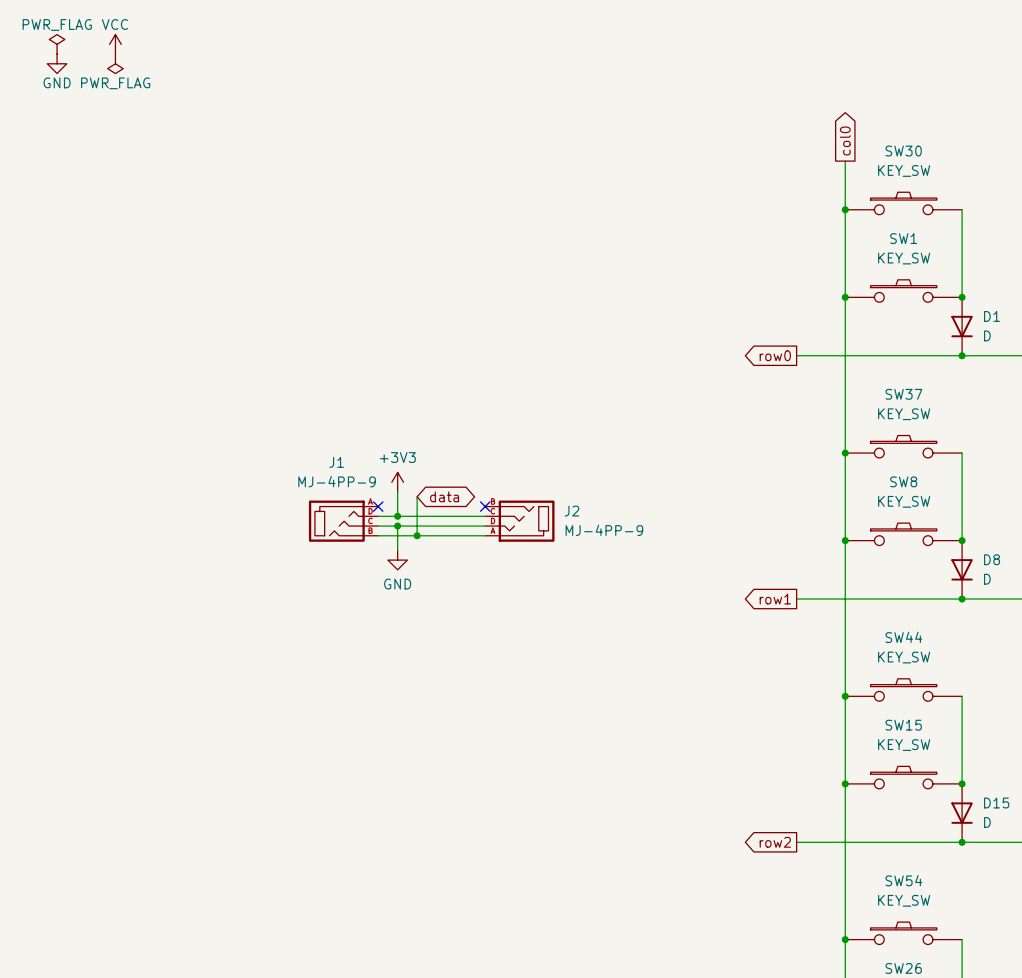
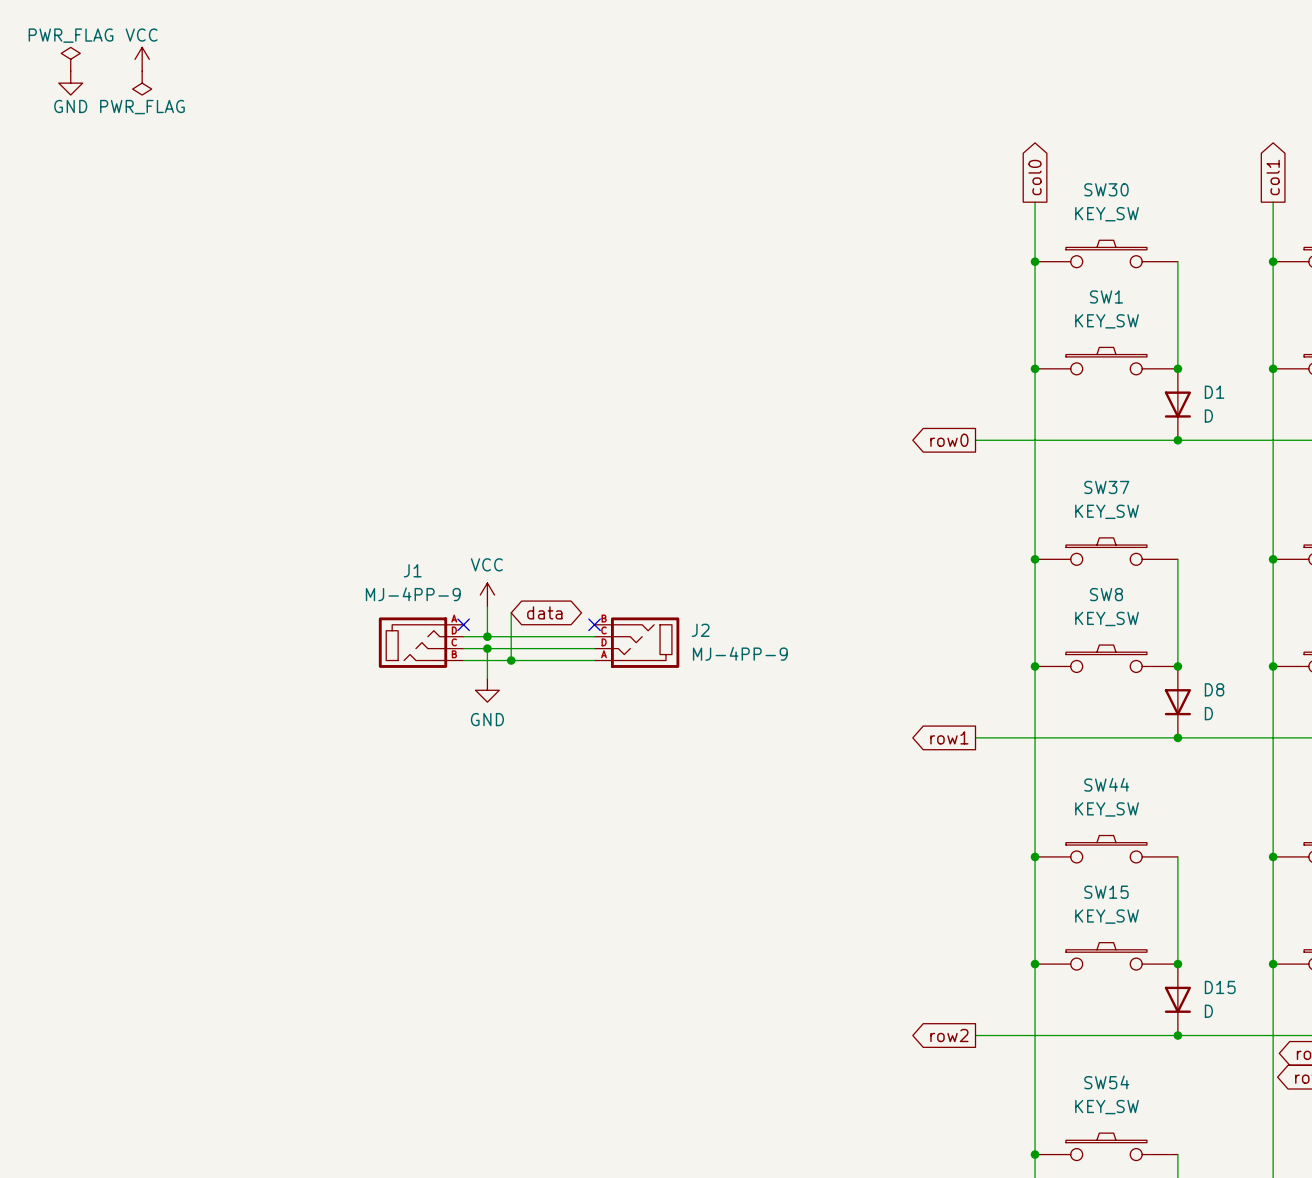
power symbol: +3V3 (397, 482) -> VCC (487, 595)

